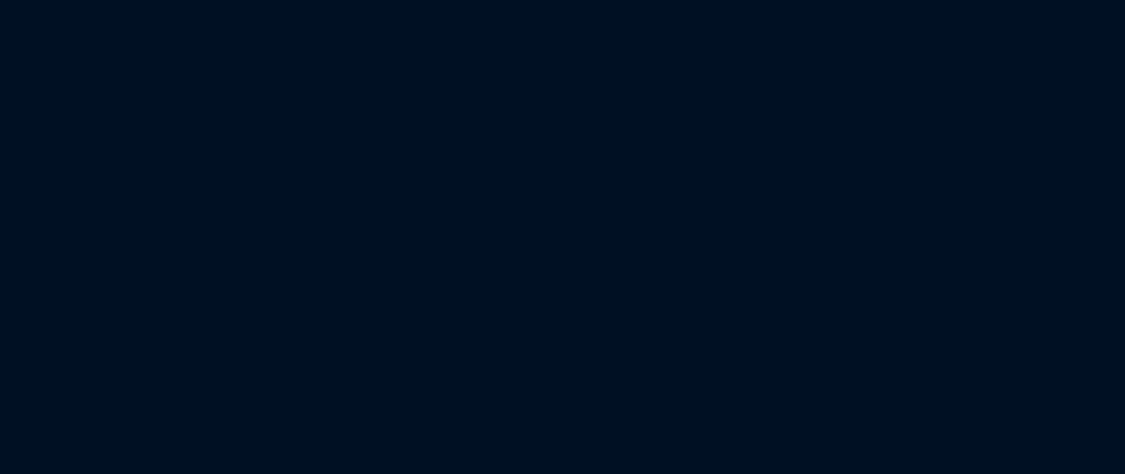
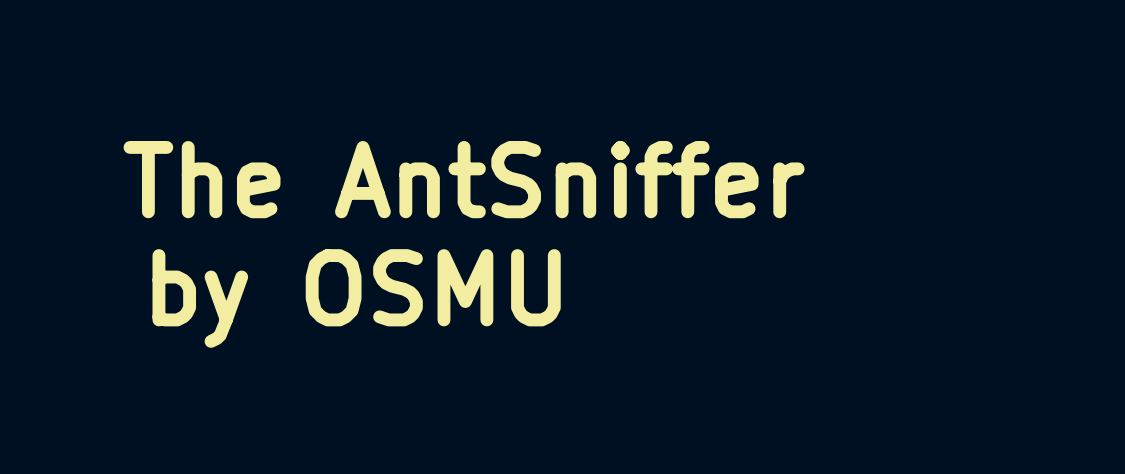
text: none -> The AntSniffer (464, 179)
text: none -> by OSMU (356, 298)

